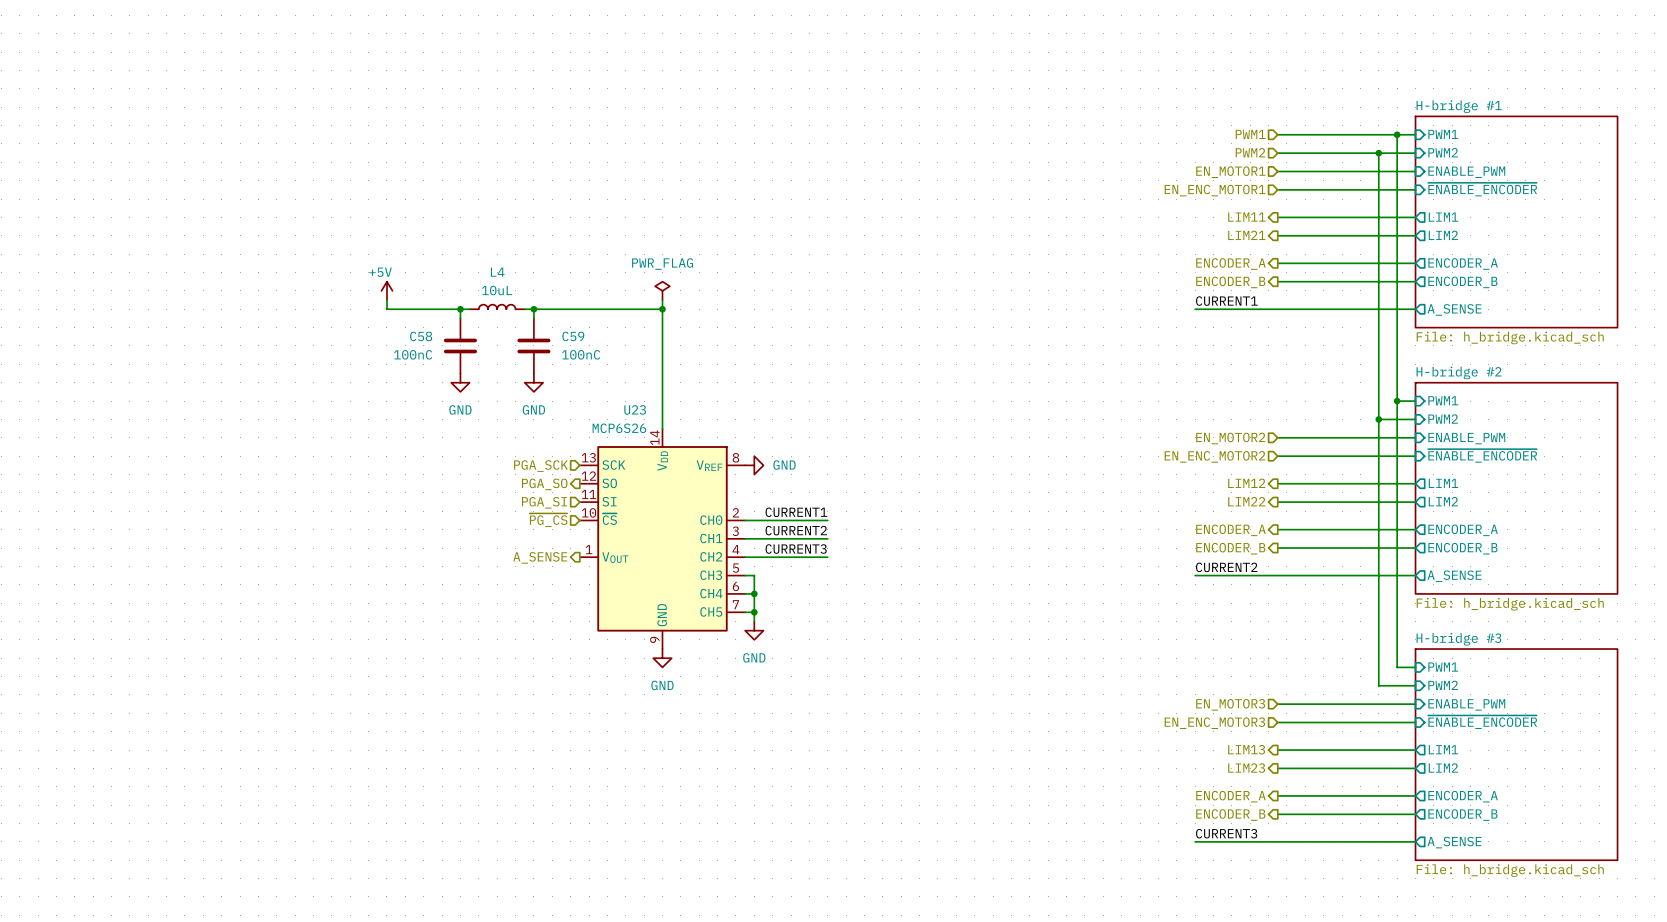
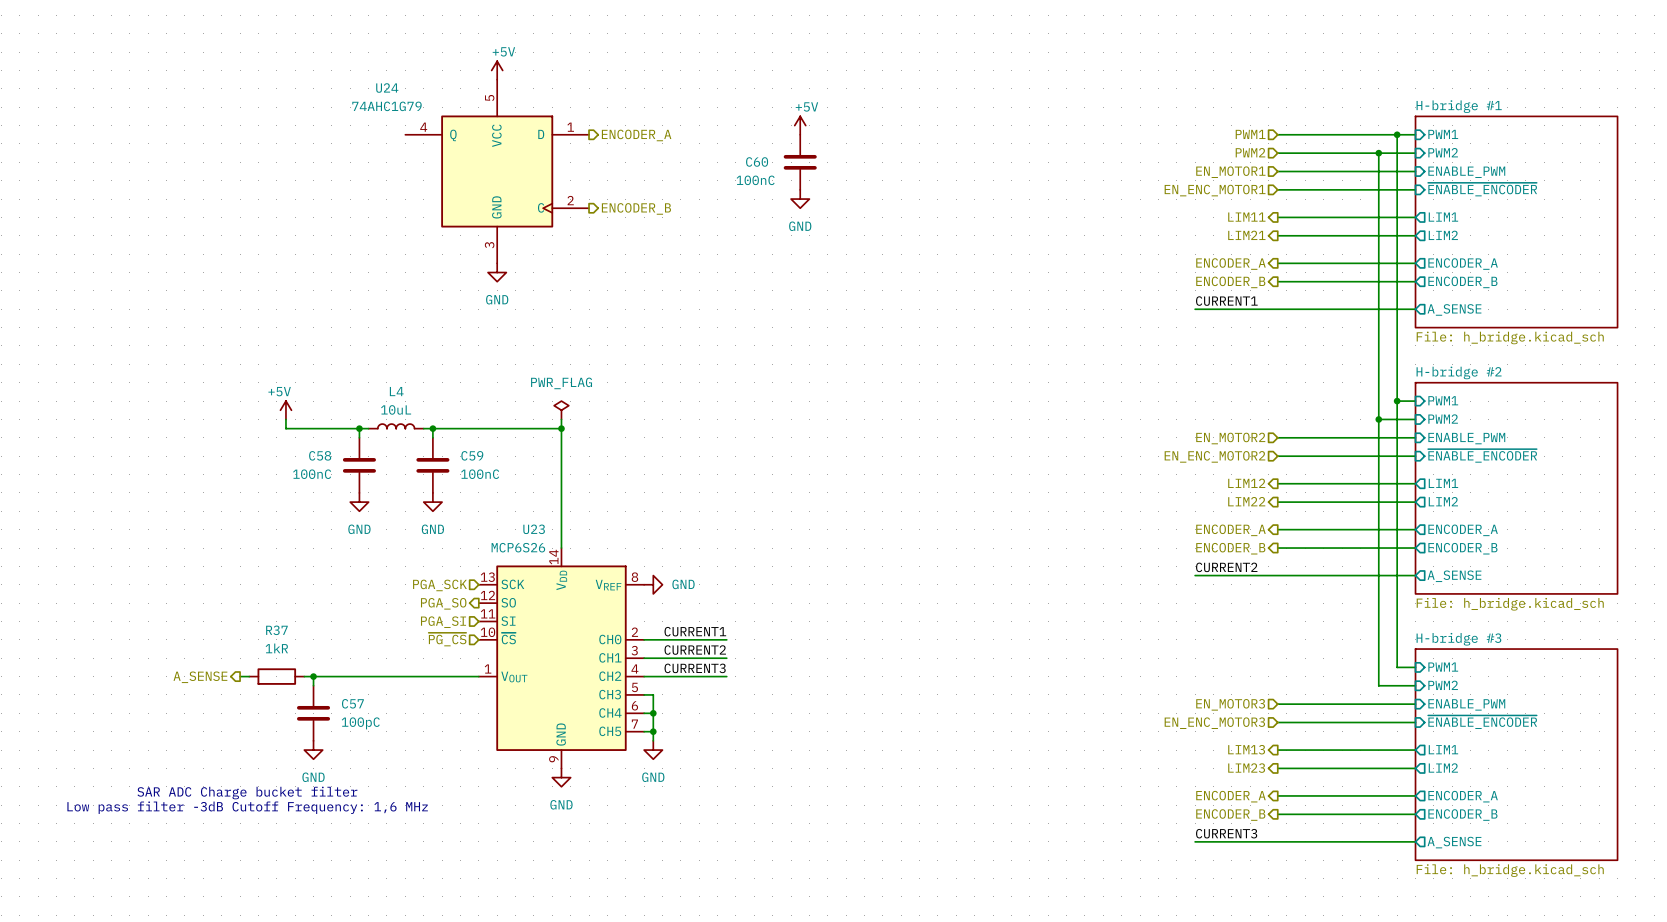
power symbol: none -> +5V (497, 70)
power symbol: none -> +5V (800, 125)
hierarchical label: none -> ENCODER_A (636, 135)
C60: none -> 100nC (800, 162)
U24: none -> 74AHC1G79 (497, 171)
power symbol: none -> GND (800, 199)
hierarchical label: none -> ENCODER_B (636, 208)
power symbol: none -> GND (497, 272)
power symbol: +5V (386, 290) -> none
power symbol position: PWR_FLAG (662, 290) -> PWR_FLAG (561, 410)
wire: (386, 300) (386, 309) (469, 309) -> (285, 419) (285, 428) (368, 428)
wire: (662, 300) (662, 428) -> (561, 419) (561, 548)
L4 position: (497, 306) -> (396, 426)
wire: (460, 309) (460, 318) -> (359, 428) (359, 437)
junction: (460, 309) -> none
wire: (524, 309) (662, 309) -> (423, 428) (561, 428)
wire: (533, 309) (533, 318) -> (432, 428) (432, 437)
junction: (533, 309) -> none
junction: (662, 309) -> none
C58 position: (460, 345) -> (359, 465)
C59 position: (533, 345) -> (432, 465)
power symbol: GND (460, 382) -> none
power symbol: GND (533, 382) -> none
power symbol: none -> +5V (285, 410)
junction: none -> (359, 428)
junction: none -> (432, 428)
junction: none -> (561, 428)
power symbol: GND (754, 465) -> none
hierarchical label position: PGA_SCK (540, 466) -> PGA_SCK (439, 585)
hierarchical label position: PGA_SO (544, 484) -> PGA_SO (443, 603)
power symbol: none -> GND (359, 502)
power symbol: none -> GND (432, 502)
hierarchical label position: PGA_SI (544, 502) -> PGA_SI (443, 622)
label position: CURRENT1 (796, 512) -> CURRENT1 (695, 631)
hierarchical label position: ~{PG_CS} (548, 520) -> ~{PG_CS} (447, 639)
wire: (745, 520) (827, 520) -> (644, 639) (726, 639)
label position: CURRENT2 (796, 530) -> CURRENT2 (695, 650)
U23 position: (662, 538) -> (561, 658)
wire: (745, 538) (827, 538) -> (644, 658) (726, 658)
label position: CURRENT3 (796, 549) -> CURRENT3 (695, 668)
hierarchical label: A_SENSE (540, 557) -> none
wire: (745, 557) (827, 557) -> (644, 676) (726, 676)
wire: (745, 575) (754, 575) (754, 621) -> (644, 694) (653, 694) (653, 740)
power symbol: none -> GND (653, 584)
wire: (745, 593) (754, 593) -> (644, 713) (653, 713)
junction: (754, 593) -> none
wire: (745, 612) (754, 612) -> (644, 731) (653, 731)
junction: (754, 612) -> none
power symbol: GND (754, 630) -> none
power symbol: GND (662, 658) -> none
wire: none -> (240, 676) (249, 676)
R37: none -> 1kR (276, 676)
wire: none -> (304, 676) (478, 676)
wire: none -> (313, 676) (313, 685)
junction: none -> (313, 676)
hierarchical label: none -> A_SENSE (200, 677)
C57: none -> 100pC (313, 713)
junction: none -> (653, 713)
junction: none -> (653, 731)
power symbol: none -> GND (313, 750)
power symbol: none -> GND (653, 750)
power symbol: none -> GND (561, 777)
text: none -> SAR ADC Charge bucket filter (247, 793)
text: none -> Low pass filter -3dB Cutoff Frequency: 1,6 MHz (247, 807)

